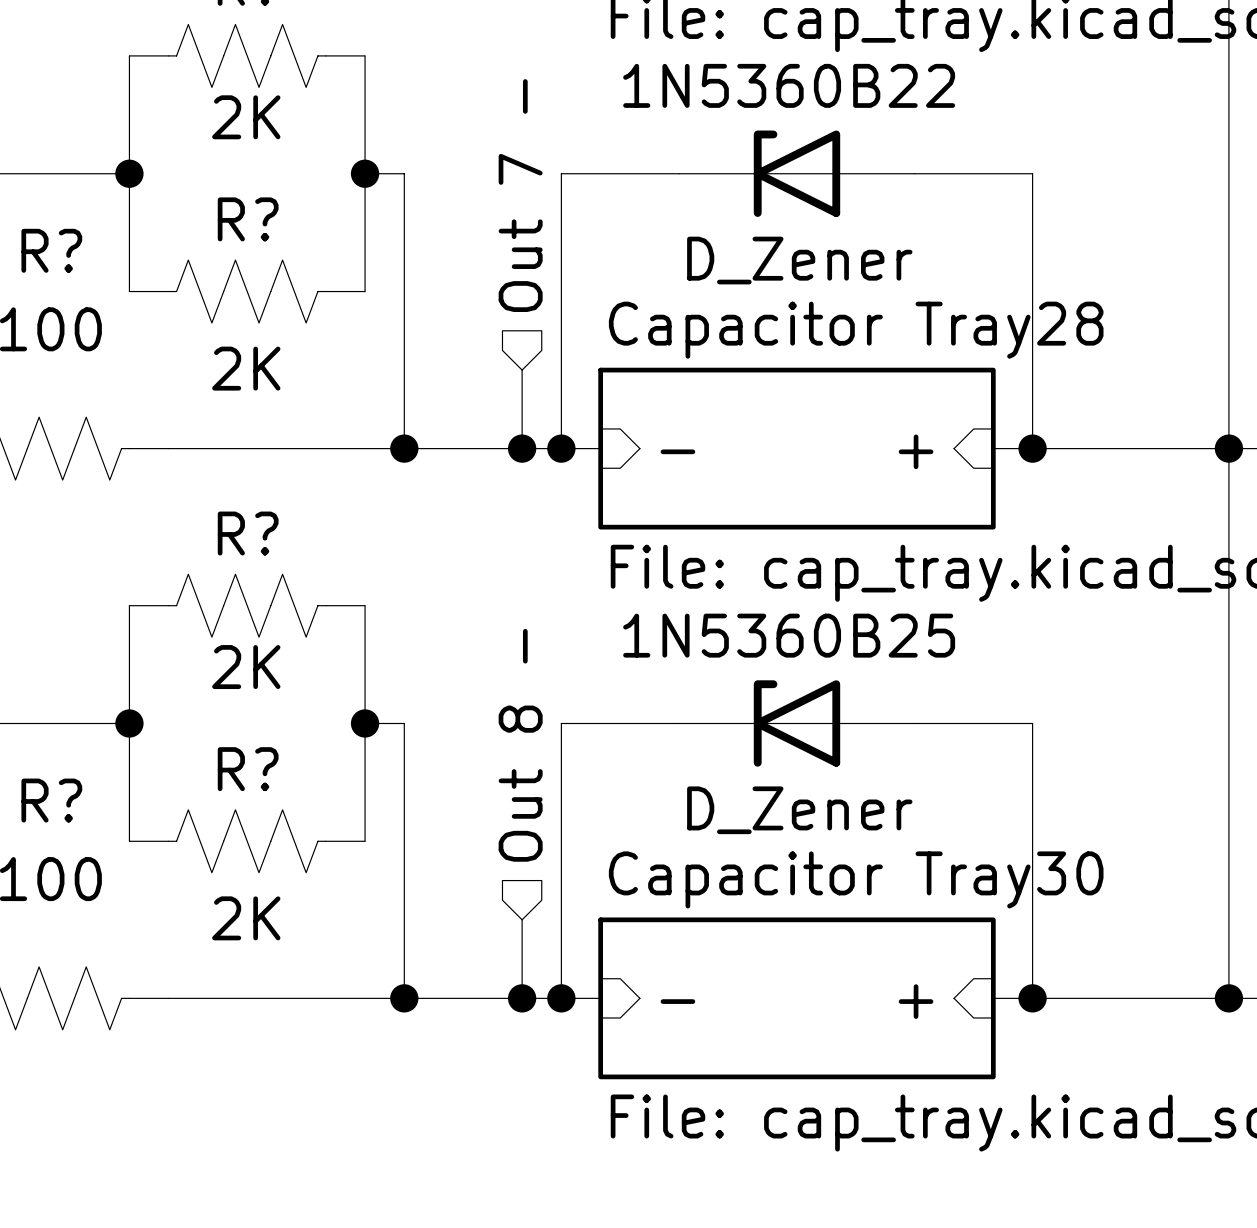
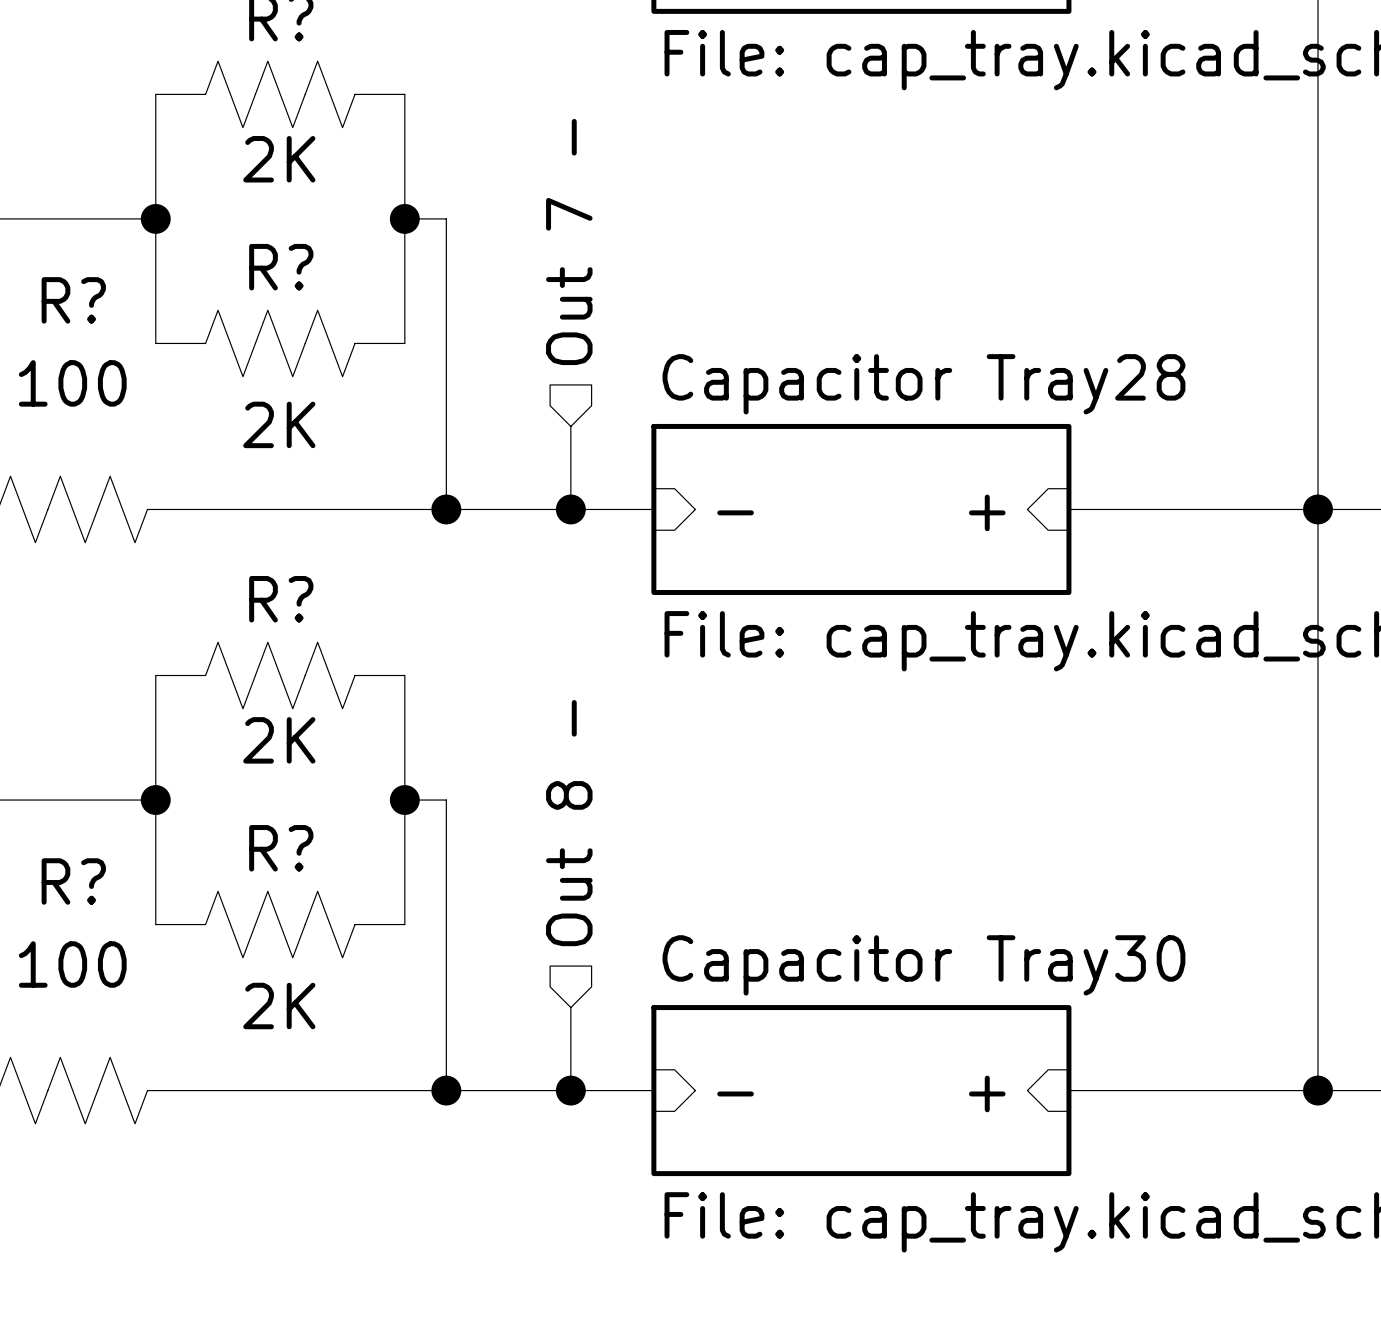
wire: (679, 173) (561, 173) (561, 448) -> none
1N5360B22: D_Zener (796, 173) -> none
wire: (914, 173) (1032, 173) (1032, 448) -> none
junction: (561, 448) -> none
junction: (1032, 448) -> none
wire: (679, 723) (561, 723) (561, 998) -> none
1N5360B25: D_Zener (796, 723) -> none
wire: (914, 723) (1032, 723) (1032, 998) -> none
junction: (561, 998) -> none
junction: (1032, 998) -> none

